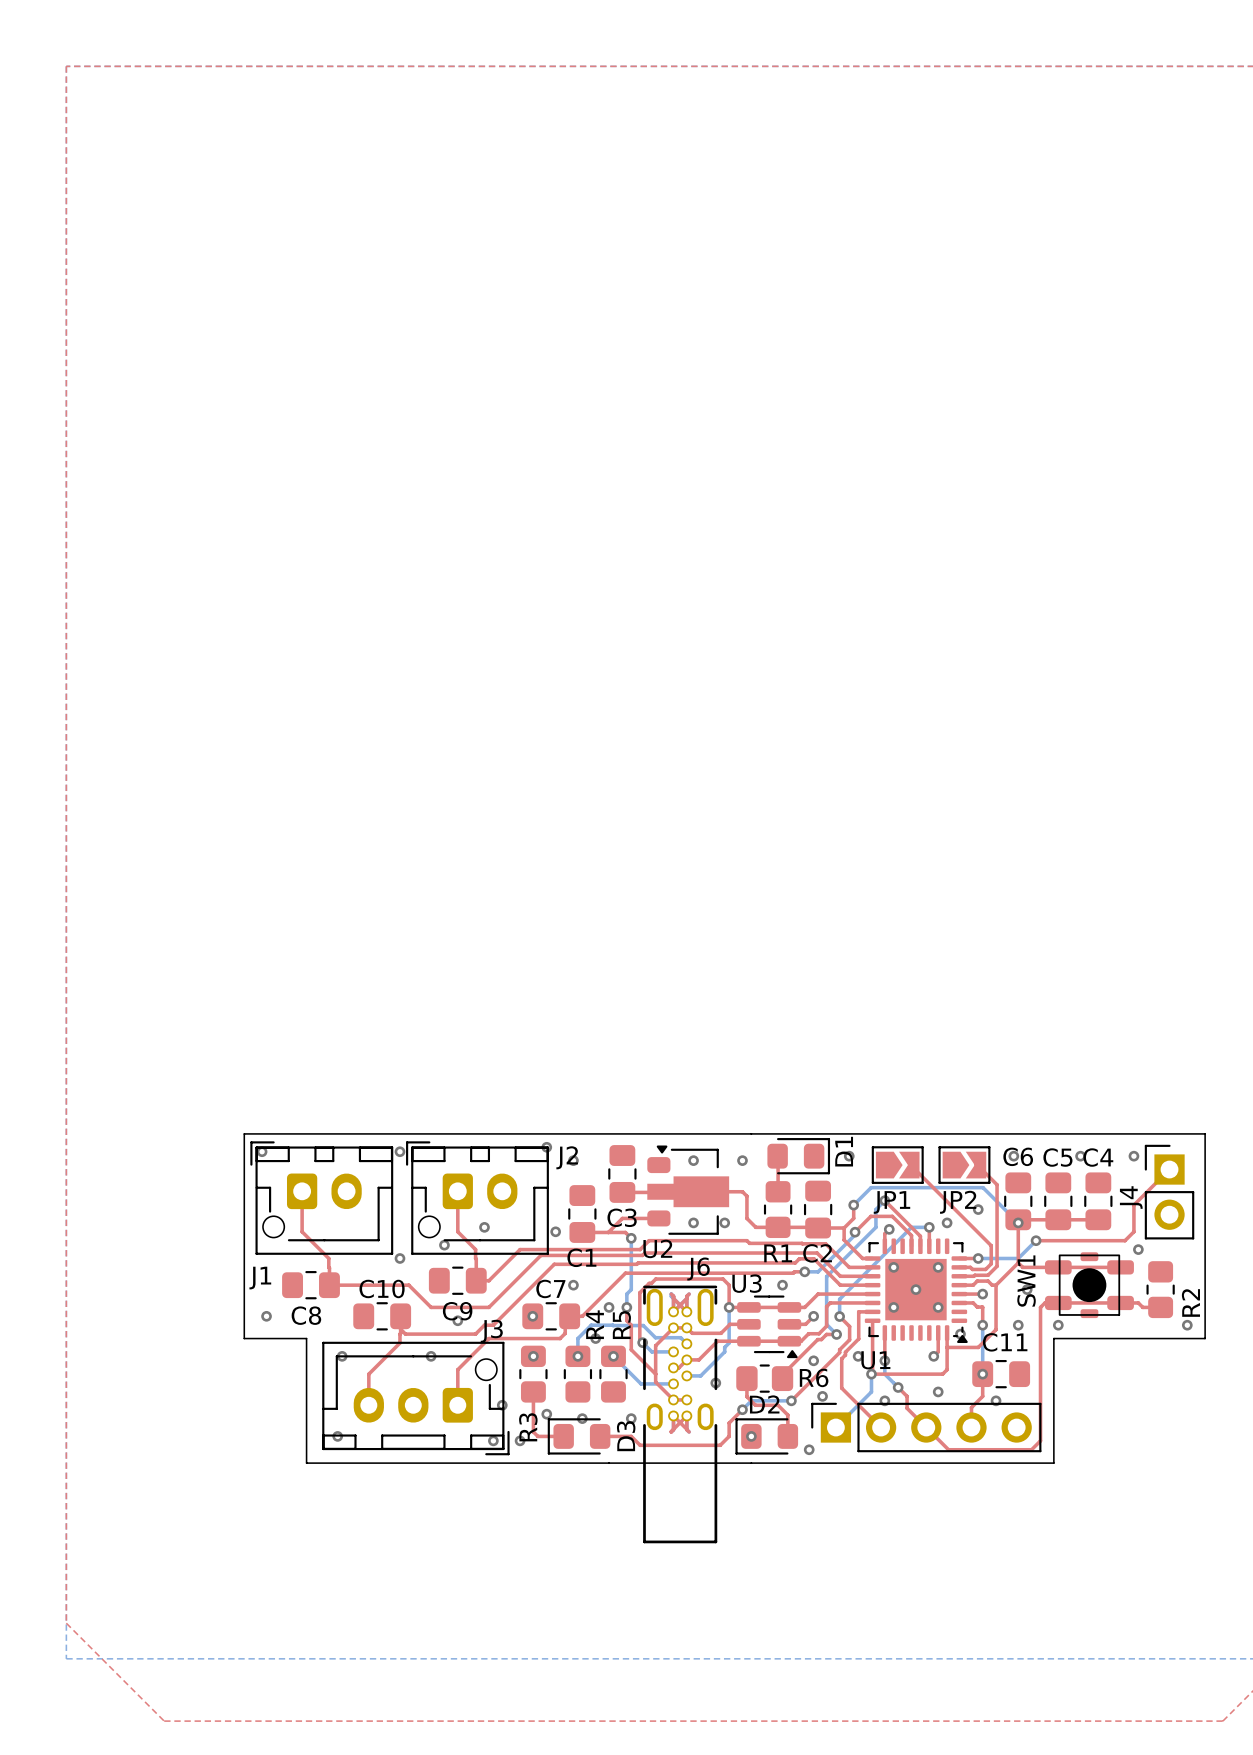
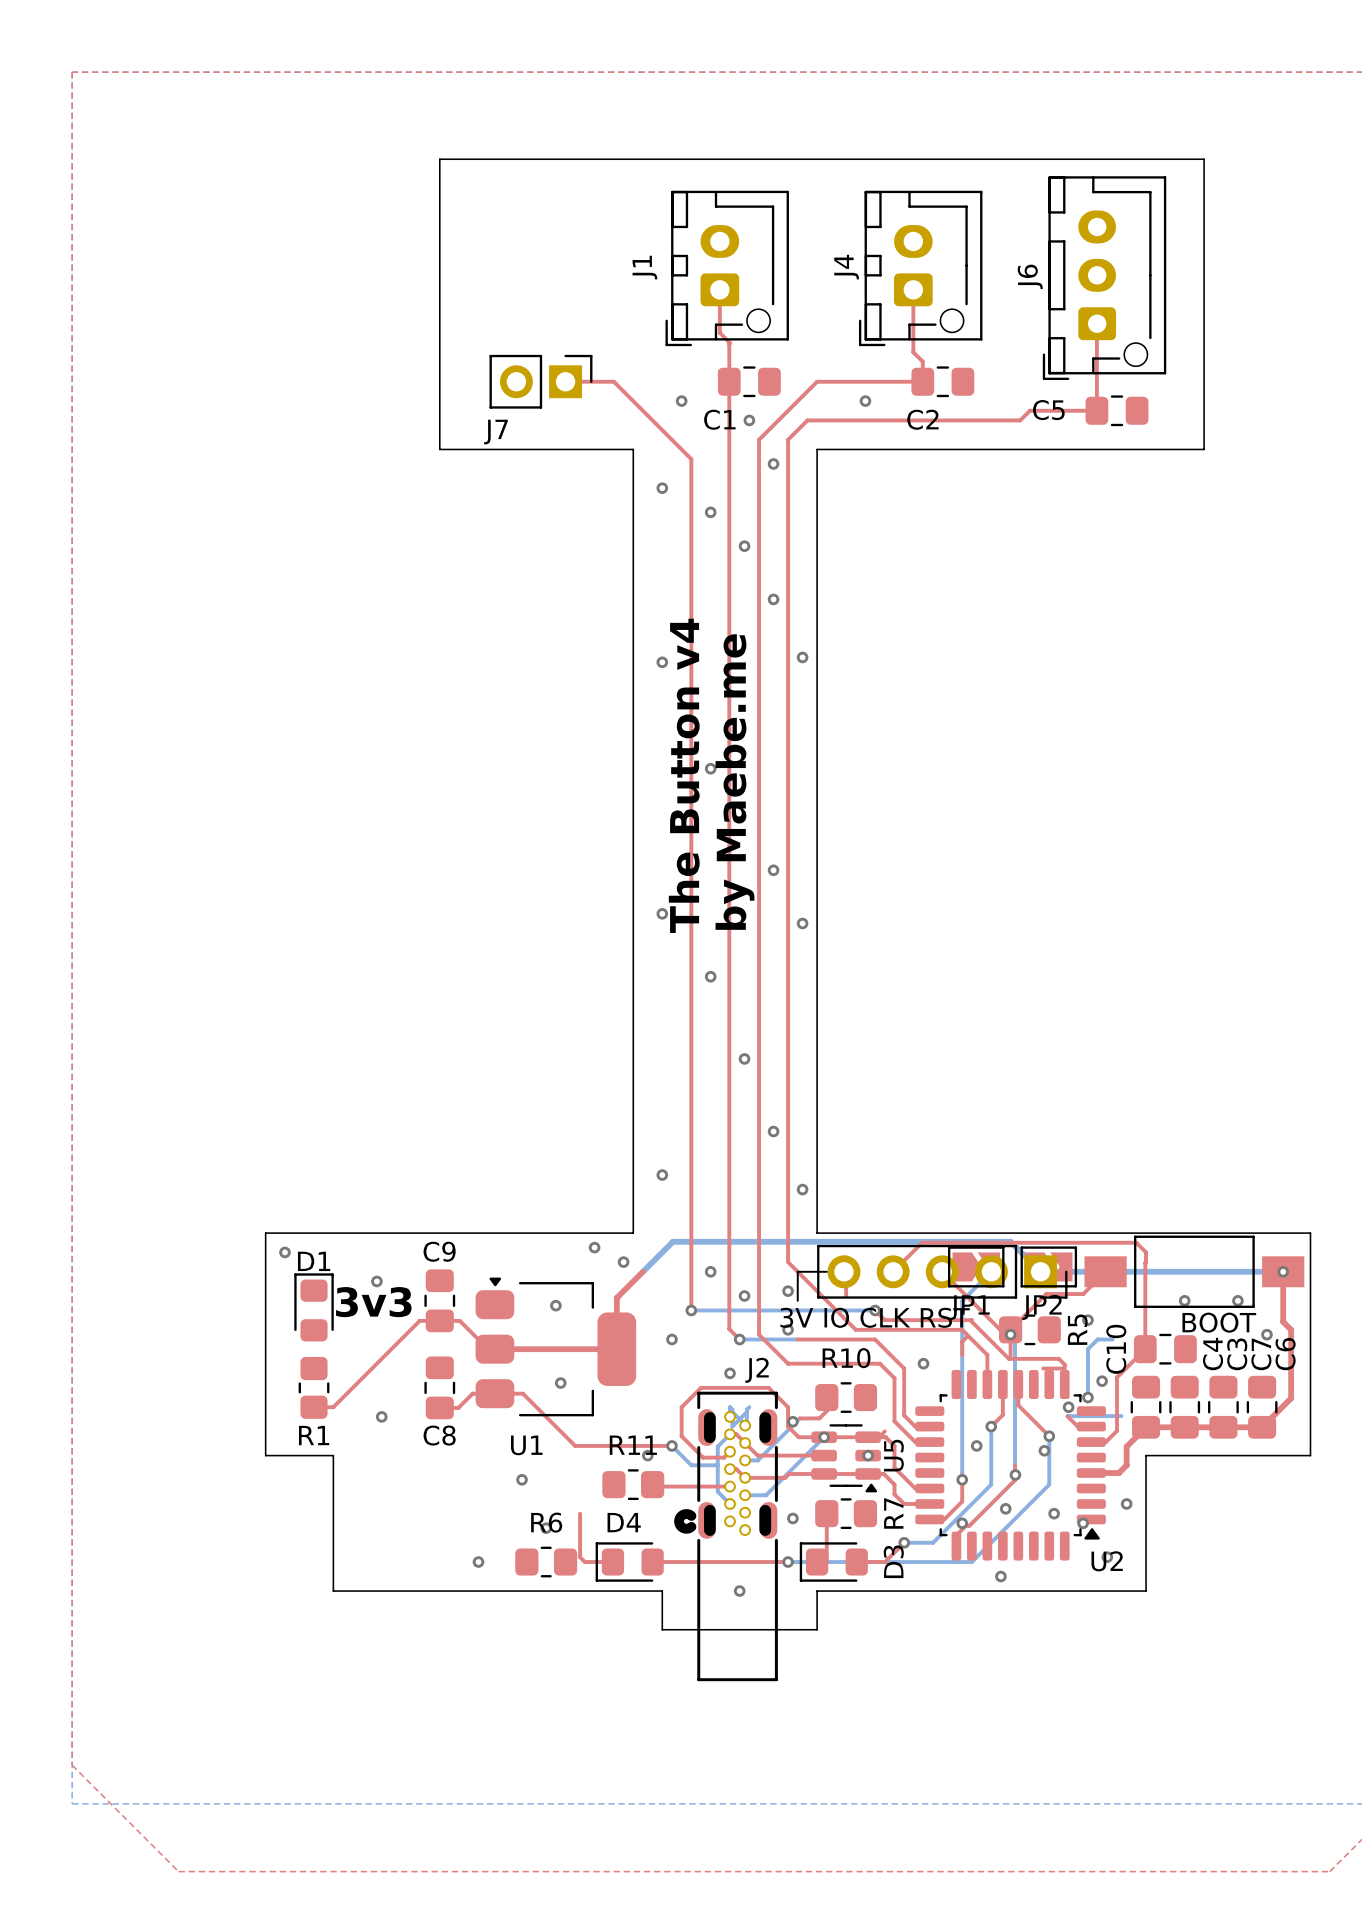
top track: none -> (719, 289) (719, 332) (730, 343) (729, 1329) (739, 1339)
top track: none -> (1096, 333) (1096, 420)
J7: none -> (540, 381)
top track: none -> (565, 381) (613, 381) (691, 459) (691, 1310)
via: none -> (681, 401)
via: none -> (865, 401)
top track: none -> (1096, 410) (1029, 410) (1020, 420) (807, 420) (788, 439) (788, 1262) (855, 1329) (962, 1329) (987, 1354) (987, 1384)
via: none -> (749, 420)
via: none -> (773, 463)
via: none -> (662, 488)
via: none -> (710, 512)
via: none -> (744, 546)
via: none -> (773, 599)
via: none -> (802, 657)
via: none -> (662, 662)
via: none -> (710, 768)
text: none -> The Button v4 (684, 775)
text: none -> by Maebe.me (734, 782)
via: none -> (773, 870)
via: none -> (662, 913)
via: none -> (802, 923)
via: none -> (710, 976)
via: none -> (744, 1058)
via: none -> (773, 1131)
via: none -> (662, 1175)
via: none -> (802, 1189)
board edge: (582, 1133) (751, 1133) -> (633, 1233) (633, 449) (439, 449) (439, 159) (1204, 159) (1204, 449) (817, 449) (817, 1233)
J2 footprint: [406, 1141, 549, 1255] -> [674, 1391, 778, 1682]
J4 footprint: [1144, 1144, 1195, 1240] -> [858, 190, 983, 347]
U2 footprint: [647, 1145, 730, 1235] -> [915, 1369, 1106, 1561]
via: (399, 1151) -> none
D1 rotation: 0° (798, 1156) -> 90° counterclockwise (314, 1307)
D1 position: (798, 1156) -> (314, 1307)
via: (849, 1156) -> none
via: (1013, 1156) -> none
C6 name rotation: 0° (1018, 1156) -> 90° counterclockwise (1285, 1354)
via: (1080, 1156) -> none
via: (1133, 1156) -> none
J2 name position: J2 (567, 1157) -> J2 (757, 1370)
C5 name position: C5 (1057, 1157) -> C5 (1048, 410)
C4 name rotation: 0° (1098, 1157) -> 90° counterclockwise (1213, 1354)
C4 name position: C4 (1098, 1157) -> C4 (1213, 1354)
via: (693, 1160) -> none
via: (742, 1160) -> none
top track: (910, 1165) (991, 1245) (991, 1263) (985, 1269) (959, 1267) -> none
top track: (977, 1165) (997, 1184) (997, 1266) (988, 1275) (959, 1276) -> none
top track: none -> (642, 1271) (616, 1297) (616, 1349) (488, 1349) (459, 1320) (419, 1320) (333, 1407) (314, 1407)
bottom track: none -> (642, 1271) (672, 1241) (1010, 1241) (1040, 1271) (1283, 1271)
via: none -> (710, 1271)
line: none -> (826, 1271) (797, 1271) (797, 1300)
top track: none -> (893, 1271) (922, 1242) (1136, 1242) (1146, 1252) (1145, 1349) (1117, 1377) (1117, 1430) (1105, 1442) (1091, 1442)
top track: none -> (942, 1271) (1000, 1329) (1010, 1329) (1046, 1294) (1083, 1294) (1105, 1271)
bottom track: none -> (991, 1271) (962, 1301) (962, 1474)
part: none -> (1194, 1271)
top track: (1169, 1169) (1133, 1205) (1133, 1231) (1125, 1240) (1036, 1240) -> none
top track: none -> (1283, 1271) (1283, 1321) (1291, 1329) (1291, 1398) (1262, 1427) (1146, 1427) (1126, 1446) (1126, 1465) (1118, 1473) (1091, 1473)
via: none -> (1283, 1271)
C3 position: (622, 1173) -> (1184, 1407)
via: none -> (376, 1281)
via: none -> (788, 1291)
top track: (302, 1191) (302, 1231) (328, 1258) (329, 1285) (408, 1285) (431, 1307) (488, 1307) (540, 1255) (817, 1253) (840, 1276) (872, 1276) -> none
top track: (457, 1191) (457, 1231) (475, 1249) (476, 1280) (488, 1280) (520, 1249) (640, 1249) (649, 1240) (746, 1240) (749, 1243) (825, 1243) (849, 1267) (872, 1267) -> none
via: none -> (744, 1295)
top track: (622, 1192) (742, 1191) (746, 1196) (746, 1218) (755, 1227) (844, 1228) -> none
via: none -> (1184, 1300)
via: none -> (1237, 1300)
text: none -> 3v3 (373, 1302)
J1 rotation: 0° (321, 1198) -> 90° counterclockwise (727, 268)
J1 position: (321, 1198) -> (727, 268)
via: none -> (555, 1305)
top track: (884, 1200) (920, 1236) (920, 1246) -> none
bottom track: (884, 1200) (875, 1209) (875, 1227) (826, 1276) (826, 1324) (836, 1334) -> none
via: (884, 1200) -> none
C6 position: (1018, 1201) -> (1262, 1407)
C5 rotation: 0° (1058, 1201) -> 90° clockwise (1117, 410)
C5 position: (1058, 1201) -> (1117, 410)
C4 position: (1098, 1201) -> (1146, 1407)
bottom track: none -> (691, 1310) (875, 1310)
via: none -> (691, 1310)
top track: none -> (875, 1310) (884, 1320) (971, 1320) (1008, 1358) (1058, 1358) (1064, 1364) (1064, 1384)
via: none -> (875, 1310)
top track: (853, 1205) (853, 1218) (844, 1228) -> none
bottom track: (853, 1205) (871, 1187) (983, 1187) (1018, 1222) -> none
via: (853, 1205) -> none
R1 position: (778, 1209) -> (314, 1387)
C2 rotation: 0° (818, 1209) -> 90° clockwise (942, 381)
C2 position: (818, 1209) -> (942, 381)
via: (978, 1209) -> none
text: none -> 3V IO CLK RST (875, 1317)
C1 rotation: 0° (582, 1214) -> 90° clockwise (749, 381)
C1 position: (582, 1214) -> (749, 381)
via: none -> (1087, 1320)
text: none -> BOOT (1219, 1322)
C3 name rotation: 0° (622, 1217) -> 90° counterclockwise (1237, 1354)
C3 name position: C3 (622, 1217) -> C3 (1237, 1354)
top track: (658, 1218) (622, 1218) (608, 1232) -> none
top track: (1098, 1219) (1018, 1219) (1018, 1262) -> none
via: (693, 1222) -> none
bottom track: none -> (1010, 1329) (1015, 1334) (1015, 1465)
via: (947, 1222) -> none
via: (1018, 1222) -> none
via: (484, 1227) -> none
bottom track: (929, 1227) (911, 1227) (839, 1299) (839, 1316) -> none
via: none -> (1266, 1334)
top track: (844, 1228) (844, 1240) (862, 1258) (872, 1258) -> none
via: (889, 1229) -> none
via: (555, 1231) -> none
bottom track: none -> (739, 1339) (797, 1339)
via: none -> (739, 1339)
top track: none -> (797, 1339) (875, 1339) (904, 1368) (904, 1415) (915, 1426) (929, 1426)
bottom track: none -> (1112, 1339) (1097, 1339) (1087, 1349) (1087, 1397)
top track: (582, 1232) (625, 1232) (631, 1238) -> none
top track: (855, 1232) (870, 1216) (892, 1216) (911, 1235) (911, 1246) -> none
bottom track: (855, 1232) (855, 1234) (818, 1271) (804, 1271) -> none
via position: (855, 1232) -> (923, 1363)
bottom track: (631, 1238) (631, 1289) (626, 1294) (626, 1307) -> none
via position: (631, 1238) -> (671, 1339)
U1 footprint: [864, 1238, 968, 1344] -> [475, 1277, 637, 1417]
bottom track: (1036, 1240) (1018, 1258) (978, 1258) -> none
via: (1036, 1240) -> none
via: (444, 1245) -> none
U2 name position: U2 (657, 1248) -> U2 (1107, 1561)
via: (1138, 1249) -> none
via: (399, 1258) -> none
top track: (814, 1258) (799, 1258) (795, 1262) (554, 1264) (493, 1325) (484, 1325) (475, 1334) (405, 1334) (400, 1329) -> (885, 1368) (879, 1363) (788, 1363) (759, 1334) (759, 439) (817, 381) (922, 381) (922, 361) (913, 352) (913, 289)
via: (978, 1258) -> none
via: none -> (730, 1373)
top track: (1018, 1262) (996, 1285) -> none
top track: (1018, 1262) (1022, 1267) (1120, 1267) -> none
top track: (822, 1267) (840, 1285) (872, 1285) -> (894, 1378) (894, 1421) (915, 1442) (929, 1442)
via: (893, 1267) -> none
via: (938, 1267) -> none
J6 name position: J6 (698, 1269) -> J6 (1030, 276)
via: none -> (1102, 1381)
via: none -> (560, 1383)
top track: (804, 1271) (625, 1273) (582, 1316) (565, 1316) (565, 1333) (560, 1338) (488, 1338) (457, 1369) (457, 1405) -> none
via: (804, 1271) -> none
top track: none -> (1002, 1384) (1002, 1414) (991, 1426)
top track: none -> (1018, 1384) (1018, 1405) (1049, 1436)
J1 name position: J1 (260, 1278) -> J1 (644, 267)
C9 rotation: 0° (457, 1280) -> 90° clockwise (439, 1300)
C9 position: (457, 1280) -> (439, 1300)
U3 name: U3 (747, 1283) -> U5 (893, 1455)
C8 rotation: 0° (311, 1285) -> 90° clockwise (439, 1387)
C8 position: (311, 1285) -> (439, 1387)
via: (573, 1285) -> none
J6 footprint: [643, 1285, 718, 1544] -> [1042, 176, 1167, 381]
top track: none -> (826, 1397) (826, 1411) (819, 1418) (799, 1418)
R10: none -> (846, 1397)
via: (782, 1285) -> none
top track: (959, 1285) (973, 1285) (977, 1281) (988, 1281) (992, 1285) (996, 1285) -> none
top track: (996, 1285) (996, 1329) (978, 1347) (947, 1347) -> none
via: none -> (1087, 1397)
SW1: (1089, 1285) -> none
C10 name rotation: 0° (382, 1288) -> 90° counterclockwise (1116, 1349)
C7 name position: C7 (550, 1288) -> C7 (1261, 1354)
via: (915, 1289) -> none
via: (1027, 1289) -> none
R2: (1160, 1289) -> none
top track: none -> (439, 1407) (458, 1407) (472, 1393) (522, 1393) (575, 1445) (671, 1445)
top track: (671, 1294) (673, 1296) (673, 1311) (686, 1298) -> none
top track: (689, 1294) (686, 1296) (686, 1311) (673, 1298) -> none
top track: (872, 1294) (818, 1294) (804, 1307) (729, 1307) (729, 1285) (722, 1279) (655, 1279) (639, 1292) (639, 1339) (642, 1342) -> none
top track: (959, 1294) (982, 1294) -> none
via: none -> (381, 1416)
top track: (872, 1302) (830, 1302) (826, 1306) (826, 1326) (819, 1333) (808, 1333) (801, 1341) (717, 1341) (698, 1359) (686, 1359) (678, 1367) (673, 1367) -> none
top track: (959, 1302) (973, 1302) (977, 1307) (982, 1307) (982, 1325) -> none
top track: none -> (1067, 1416) (1077, 1426) (1091, 1426)
bottom track: none -> (1121, 1416) (1067, 1416)
bottom track: none -> (799, 1418) (757, 1460) (745, 1460)
via: (609, 1307) -> none
top track: none -> (681, 1421) (681, 1407) (701, 1387) (768, 1387) (788, 1407) (788, 1426) (798, 1437) (885, 1437) (894, 1445) (894, 1467) (915, 1488) (929, 1488)
via: (626, 1307) -> none
bottom track: (729, 1307) (729, 1343) (724, 1347) (724, 1351) (700, 1375) (686, 1375) -> none
via: (893, 1307) -> none
via: (938, 1307) -> none
top track: (1160, 1307) (1142, 1307) (1138, 1302) (1044, 1302) (1040, 1307) (1040, 1440) (1031, 1449) (948, 1449) (907, 1408) (907, 1396) (898, 1387) -> none
C9 name position: C9 (457, 1311) -> C9 (439, 1251)
top track: (872, 1311) (858, 1311) (858, 1338) (841, 1358) (841, 1388) (881, 1427) -> none
bottom track: none -> (991, 1426) (991, 1484) (933, 1542) (904, 1542)
via: none -> (991, 1426)
via: (266, 1316) -> none
C10 position: (382, 1316) -> (1165, 1349)
via: (532, 1316) -> none
C7 rotation: 0° (551, 1316) -> 90° clockwise (1223, 1407)
C7 position: (551, 1316) -> (1223, 1407)
via: (813, 1316) -> none
top track: (839, 1316) (849, 1326) (849, 1339) (839, 1349) (839, 1352) (791, 1400) -> none
via: (839, 1316) -> none
top track: none -> (730, 1434) (736, 1434) (757, 1455) (824, 1455)
bottom track: none -> (730, 1434) (717, 1446) (717, 1491) (730, 1503)
top track: (405, 1320) (400, 1316) (399, 1343) (368, 1374) (368, 1405) -> none
via: (457, 1320) -> none
top track: (872, 1320) (871, 1374) (942, 1374) (947, 1369) (947, 1332) -> none
bottom track: none -> (1049, 1436) (1049, 1484) (971, 1562) (788, 1562)
via: none -> (1049, 1436)
bottom track: none -> (824, 1437) (766, 1495) (745, 1495)
via: none -> (824, 1437)
top track: (748, 1324) (730, 1324) (721, 1333) (692, 1333) (686, 1327) (673, 1327) (655, 1345) (655, 1382) (673, 1399) (686, 1399) -> none
top track: (631, 1325) (631, 1349) (655, 1374) -> (686, 1441) (703, 1457) (724, 1457) (730, 1451)
bottom track: (982, 1325) (982, 1374) -> none
via: (982, 1325) -> none
via: (1018, 1325) -> none
via: (1058, 1325) -> none
via: (1187, 1325) -> none
U3 position: (769, 1326) -> (846, 1458)
bottom track: none -> (671, 1445) (691, 1465) (717, 1465)
via: none -> (671, 1445)
via: none -> (976, 1445)
top track: (884, 1332) (884, 1356) -> none
top track: (938, 1332) (938, 1351) (933, 1356) -> none
top track: (836, 1334) (826, 1334) (821, 1339) (817, 1339) (782, 1374) (782, 1378) -> none
via: (836, 1334) -> none
via: none -> (868, 1455)
bottom track: (642, 1342) (651, 1351) (673, 1351) -> none
via: (642, 1342) -> none
bottom track: (686, 1343) (680, 1337) (655, 1337) (643, 1325) (591, 1325) (577, 1338) (577, 1356) -> none
top track: none -> (1015, 1465) (1015, 1480) (969, 1525) (965, 1525) (956, 1535) (956, 1546)
top track: none -> (730, 1469) (736, 1469) (745, 1477) (785, 1477) (789, 1473) (883, 1473) (894, 1484) (894, 1494) (904, 1503) (929, 1503)
via: (342, 1356) -> none
via: (431, 1356) -> none
via: (533, 1356) -> none
via: (577, 1356) -> none
bottom track: (613, 1356) (641, 1383) (673, 1383) -> none
via: (613, 1356) -> none
via: (858, 1356) -> none
via: none -> (522, 1479)
via: (813, 1360) -> none
top track: none -> (962, 1479) (962, 1501) (944, 1519) (929, 1519)
bottom track: (884, 1360) (884, 1374) (898, 1387) -> none
R11: none -> (633, 1484)
top track: none -> (652, 1484) (654, 1486) (730, 1486)
R3: (533, 1374) -> none
R4: (577, 1374) -> none
R5 rotation: 0° (613, 1374) -> 90° clockwise (1029, 1329)
R5 position: (613, 1374) -> (1029, 1329)
bottom track: (871, 1374) (871, 1391) (835, 1427) -> none
via: (871, 1374) -> none
top track: (982, 1374) (982, 1396) (971, 1407) (971, 1427) -> none
via: (982, 1374) -> none
C11: (1001, 1374) -> none
R6 name position: R6 (814, 1377) -> R6 (546, 1522)
top track: (746, 1378) (746, 1396) (755, 1405) (778, 1405) (787, 1415) (787, 1436) -> none
R6 position: (764, 1378) -> (546, 1562)
via: (715, 1383) -> none
via: none -> (1126, 1503)
via: (898, 1387) -> none
via: none -> (1005, 1508)
top track: none -> (826, 1513) (826, 1562)
R7: none -> (846, 1513)
via: (938, 1391) -> none
via: none -> (1054, 1513)
via: none -> (792, 1518)
via: (822, 1396) -> none
J3: (415, 1398) -> none
bottom track: (791, 1400) (751, 1400) (742, 1409) -> none
via: (791, 1400) -> none
D2 name: D2 (764, 1404) -> D3 (893, 1561)
top track: (742, 1409) (729, 1423) (729, 1436) (720, 1445) (640, 1445) (631, 1436) -> (788, 1562) (686, 1562)
via: (742, 1409) -> none
via: (546, 1414) -> none
via: (582, 1418) -> none
via: (631, 1418) -> none
top track: none -> (904, 1542) (885, 1562) (866, 1562)
via: none -> (904, 1542)
part rotation: 0° (926, 1427) -> 180° (942, 1271)
part position: (926, 1427) -> (942, 1271)
top track: (686, 1429) (673, 1415) (673, 1429) (671, 1431) (671, 1431) (686, 1415) (686, 1429) (689, 1431) -> none
via: none -> (1107, 1557)
via: (337, 1436) -> none
via: none -> (478, 1562)
D3 name: D3 (626, 1436) -> D4 (624, 1522)
via: none -> (788, 1562)
via: (751, 1436) -> none
via: (493, 1440) -> none
via: (520, 1440) -> none
via: (809, 1449) -> none
via: none -> (1000, 1576)
board edge: (609, 1463) (751, 1463) -> (662, 1591) (662, 1629) (817, 1629) (817, 1591)
via: none -> (739, 1591)

